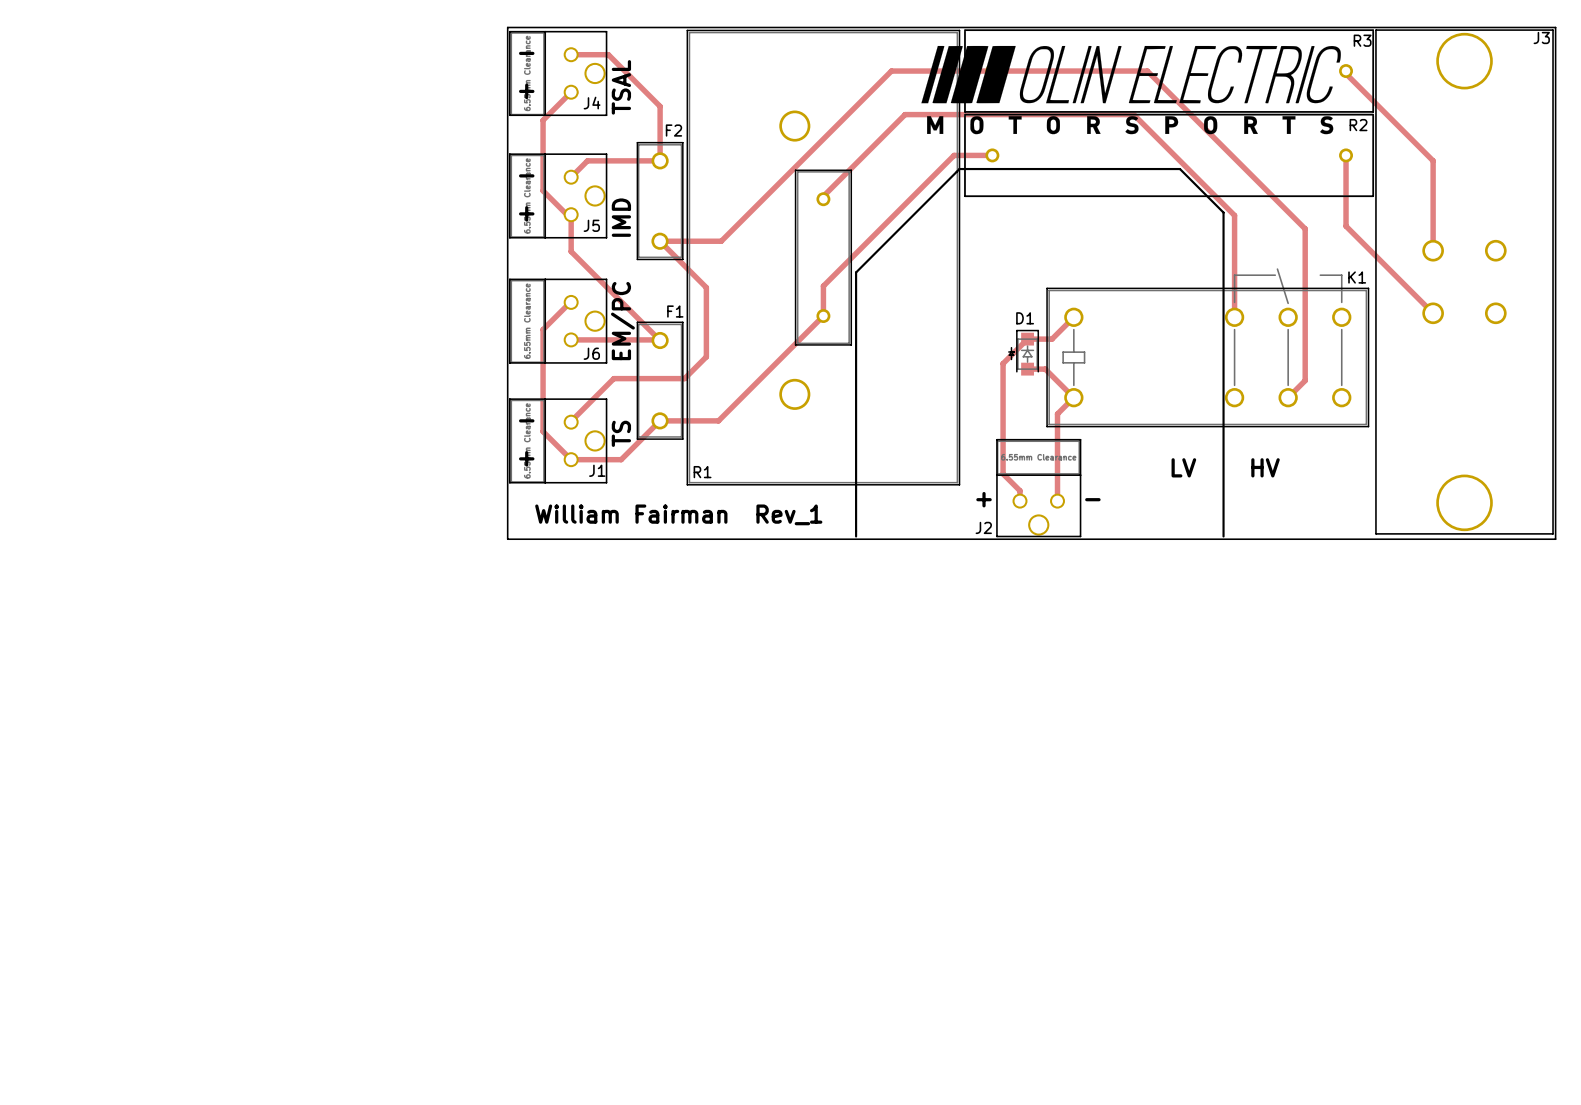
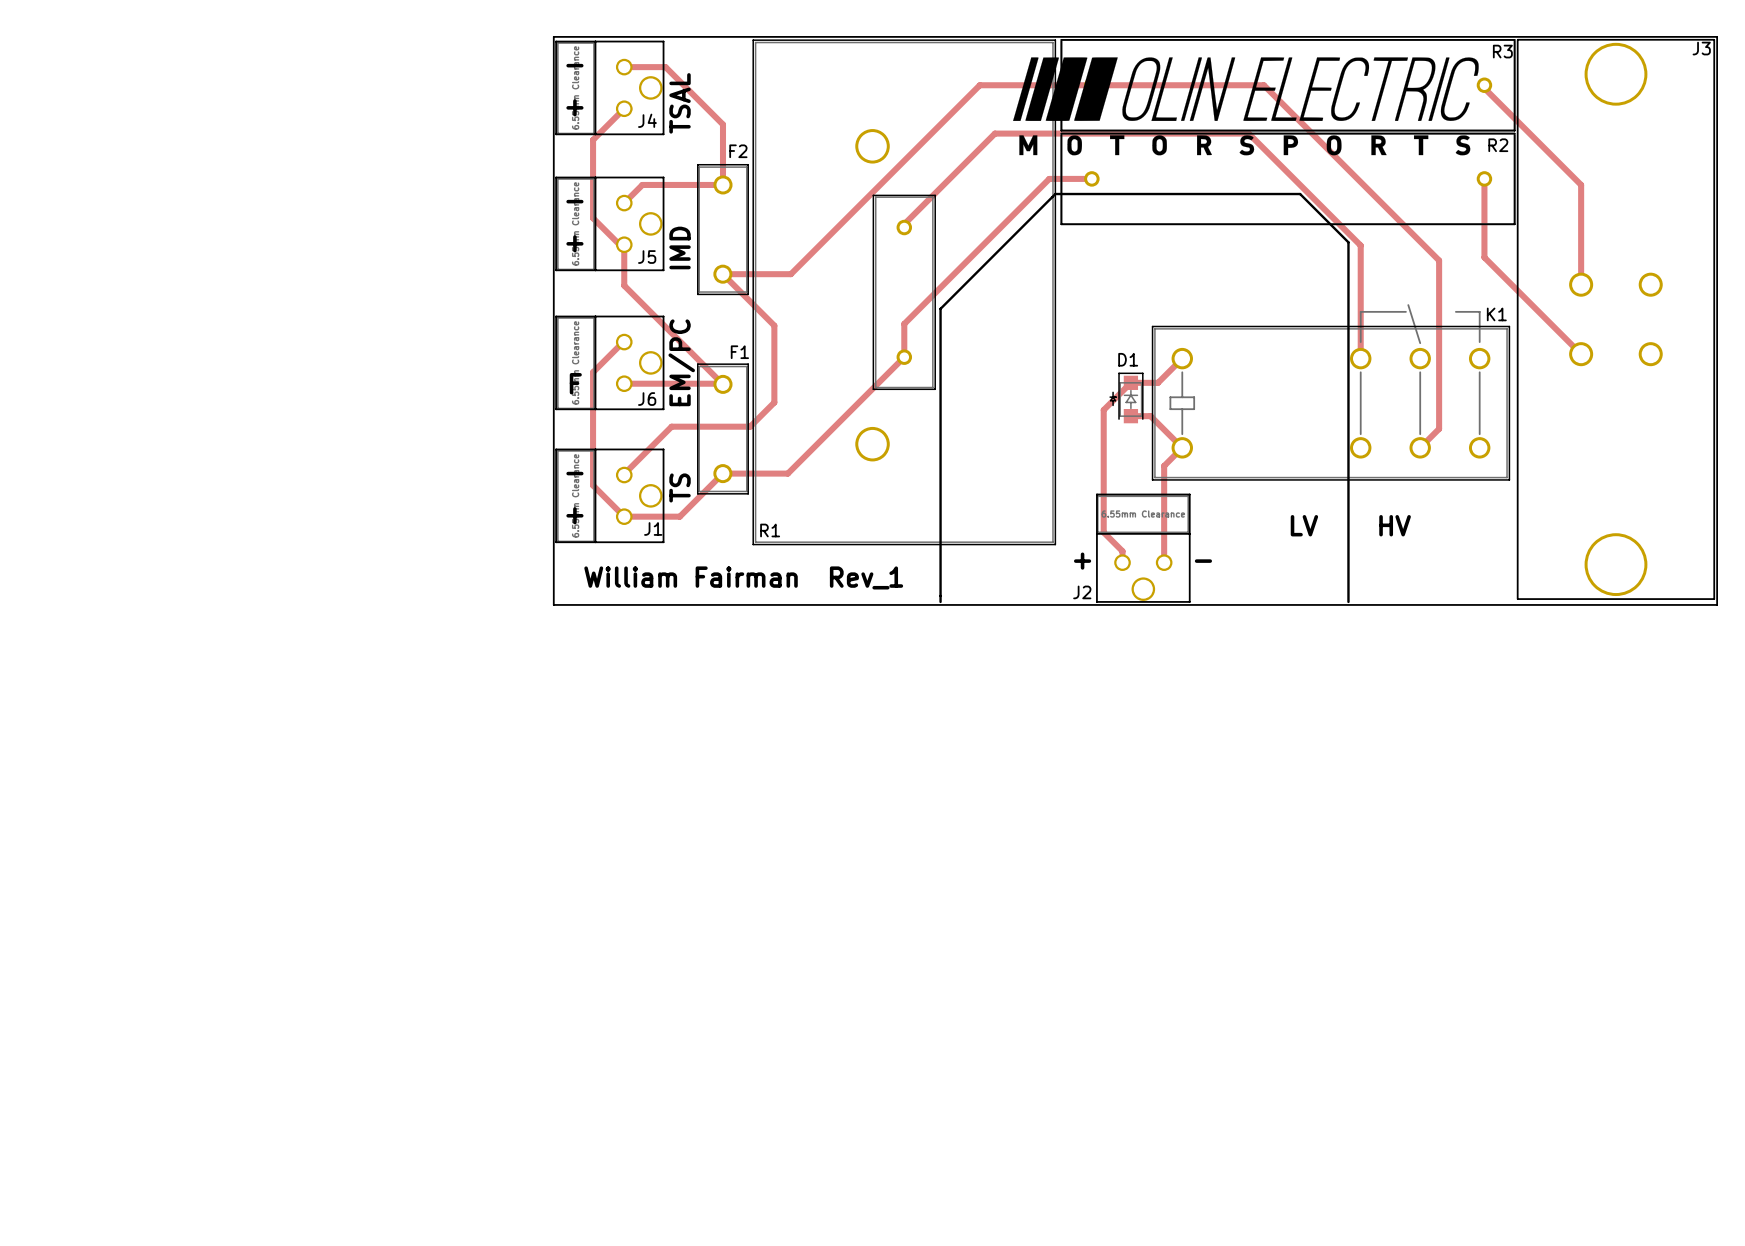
text: none -> F (575, 383)

